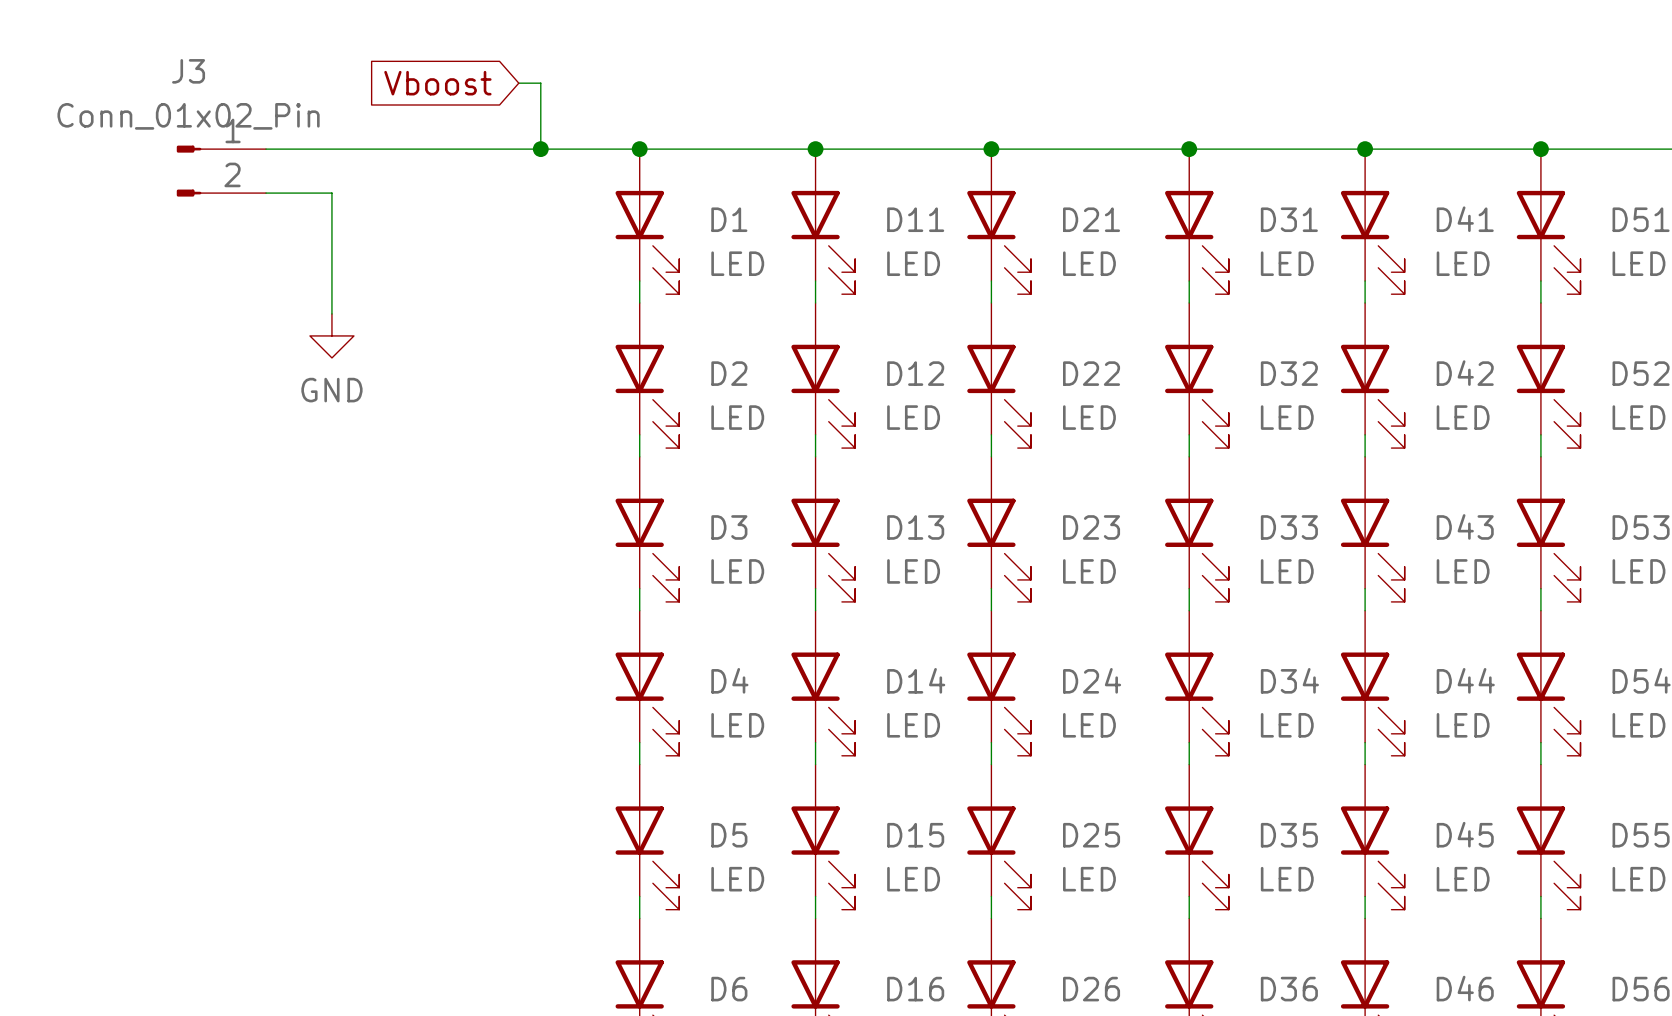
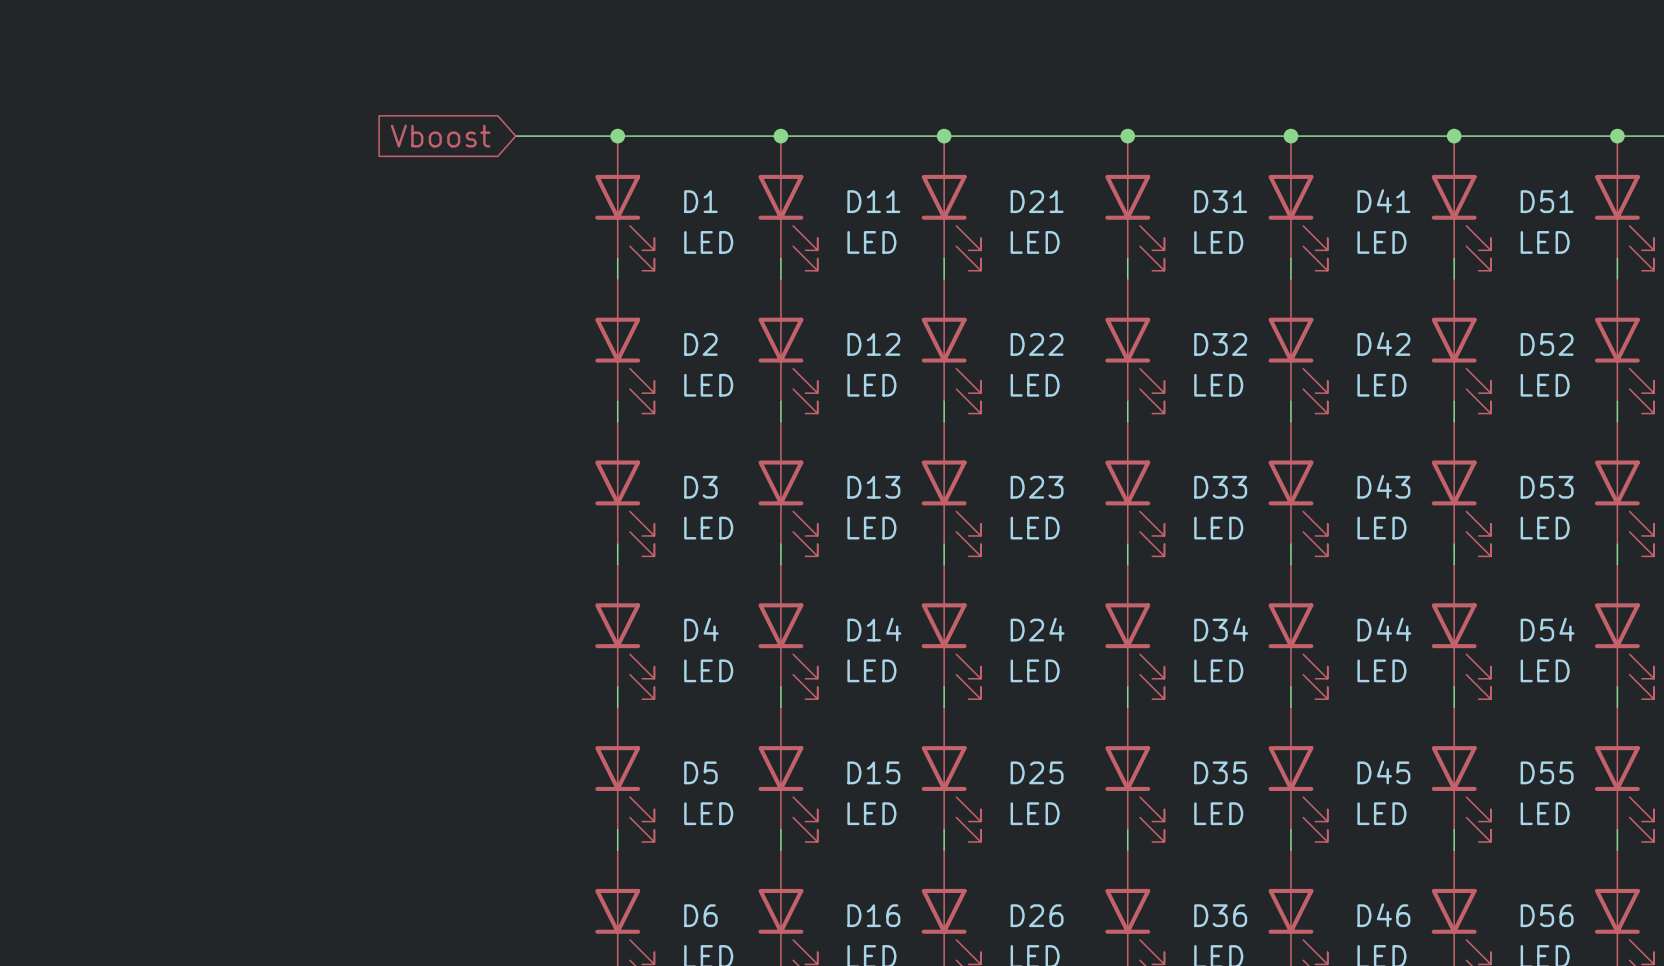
global label position: Vboost (437, 83) -> Vboost (440, 136)
wire: (518, 83) (540, 83) (540, 149) -> none
wire: (266, 149) (529, 149) -> none
junction: (540, 149) -> none
J3: Conn_01x02_Pin (221, 171) -> none
wire: (266, 193) (331, 193) (331, 313) -> none
power symbol: GND (331, 335) -> none

